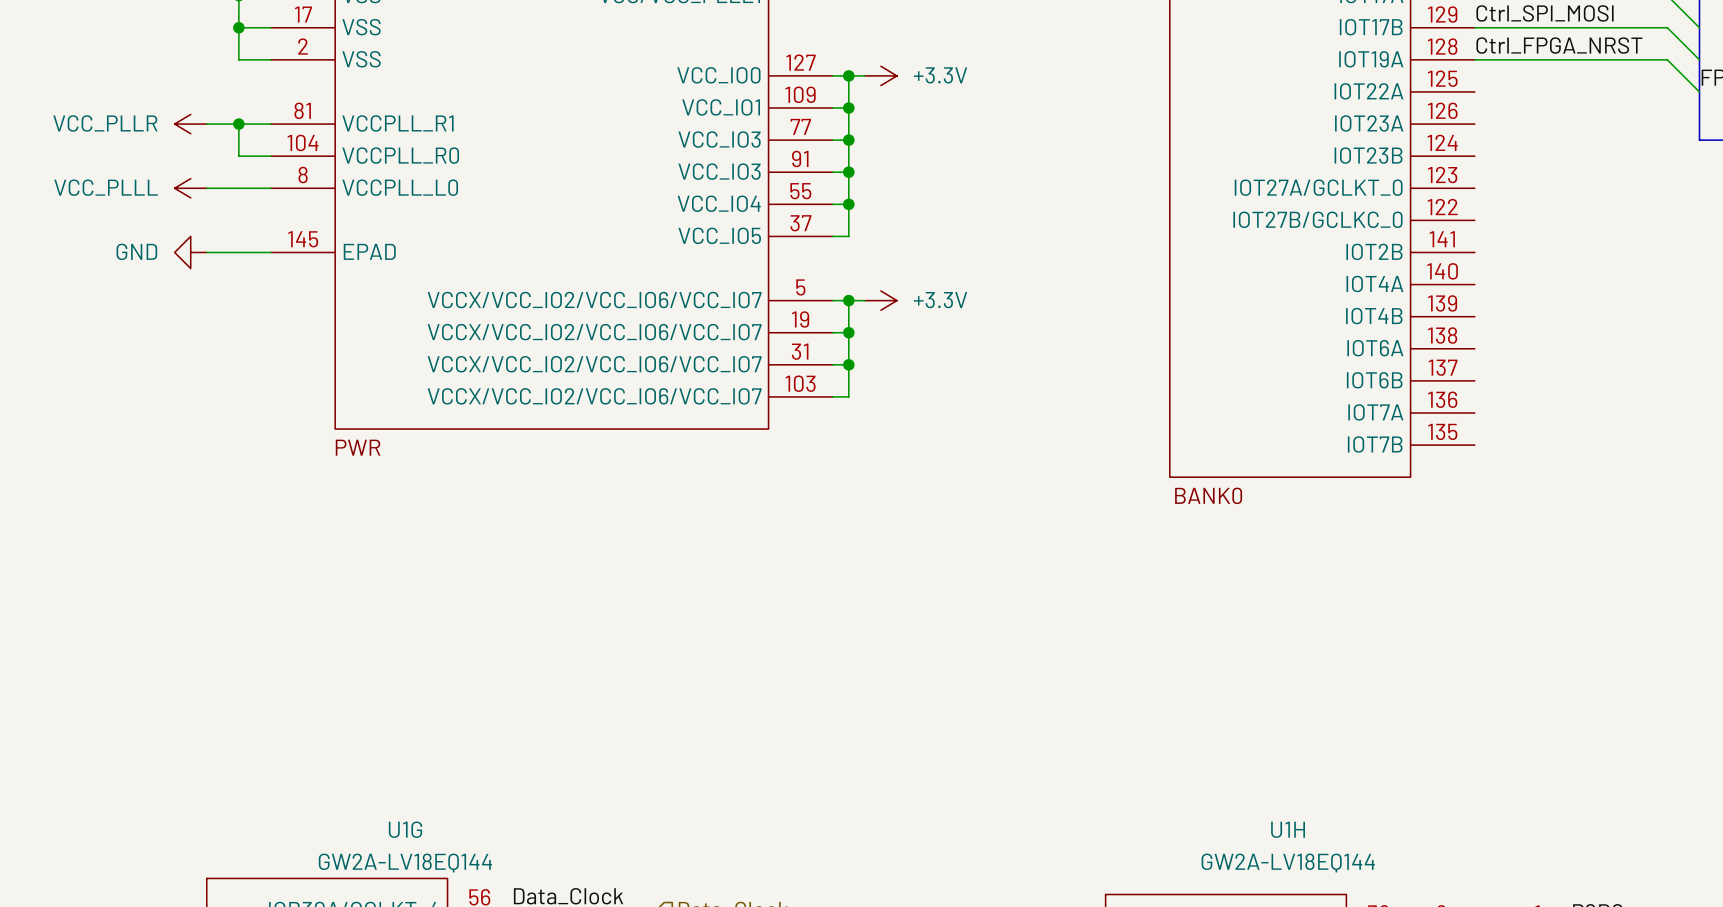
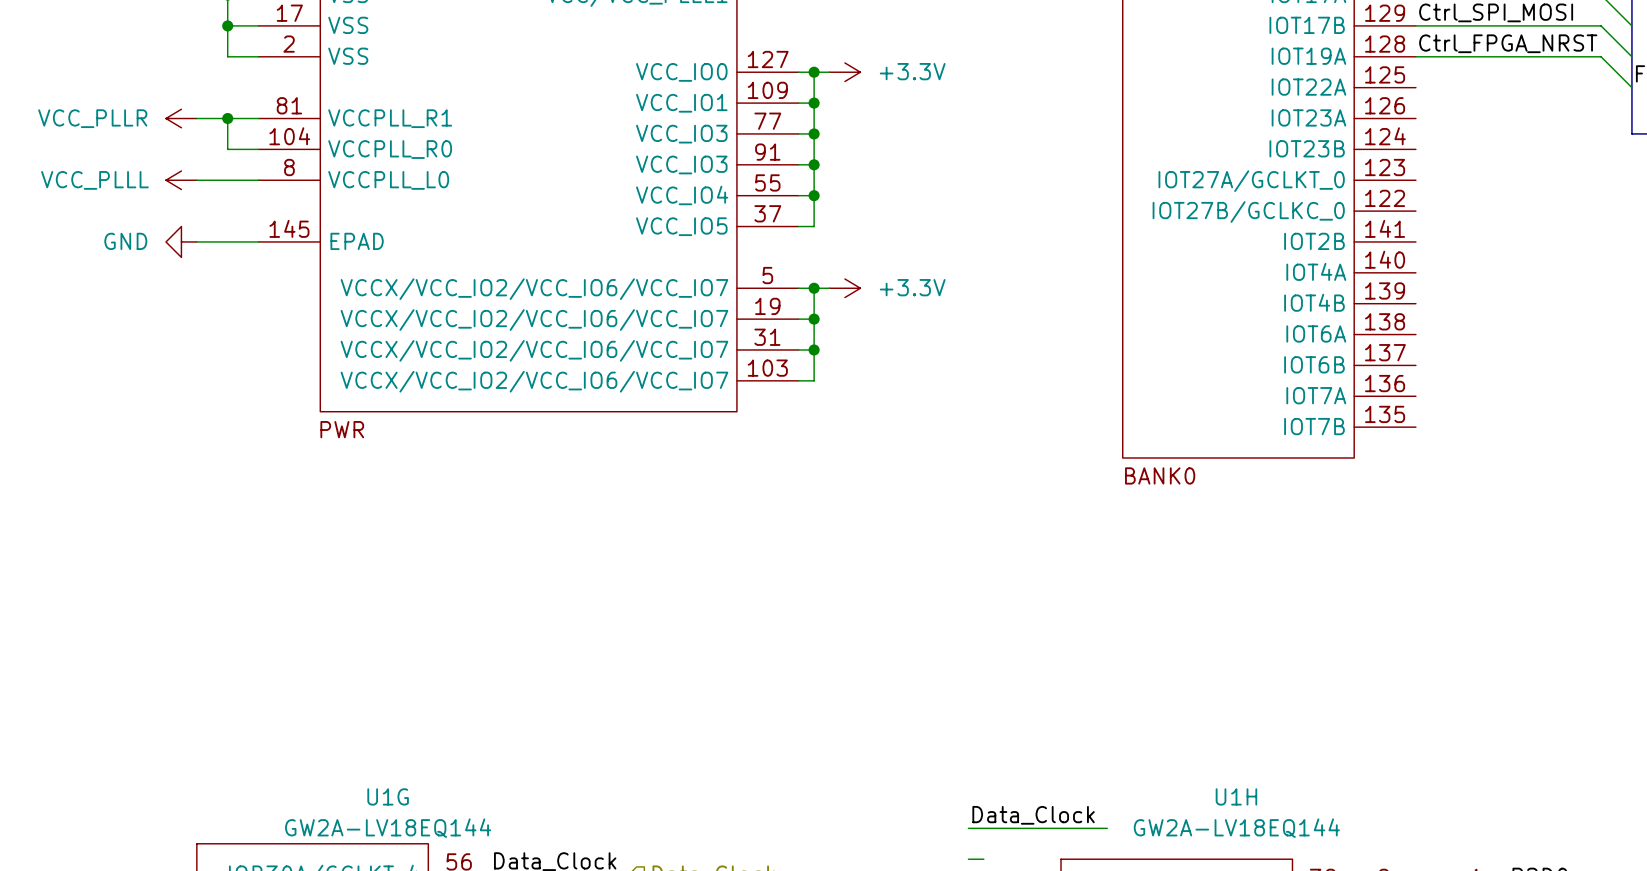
label: none -> Data_Clock (1033, 815)
wire: none -> (968, 828) (1107, 828)
wire: none -> (968, 859) (983, 859)

